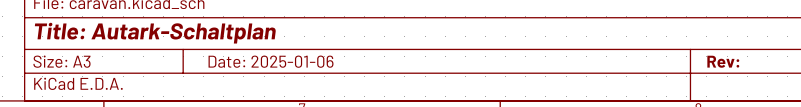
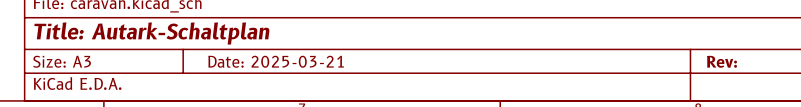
title block: Date: 2025-01-06 (271, 61) -> Date: 2025-03-21 (276, 61)

